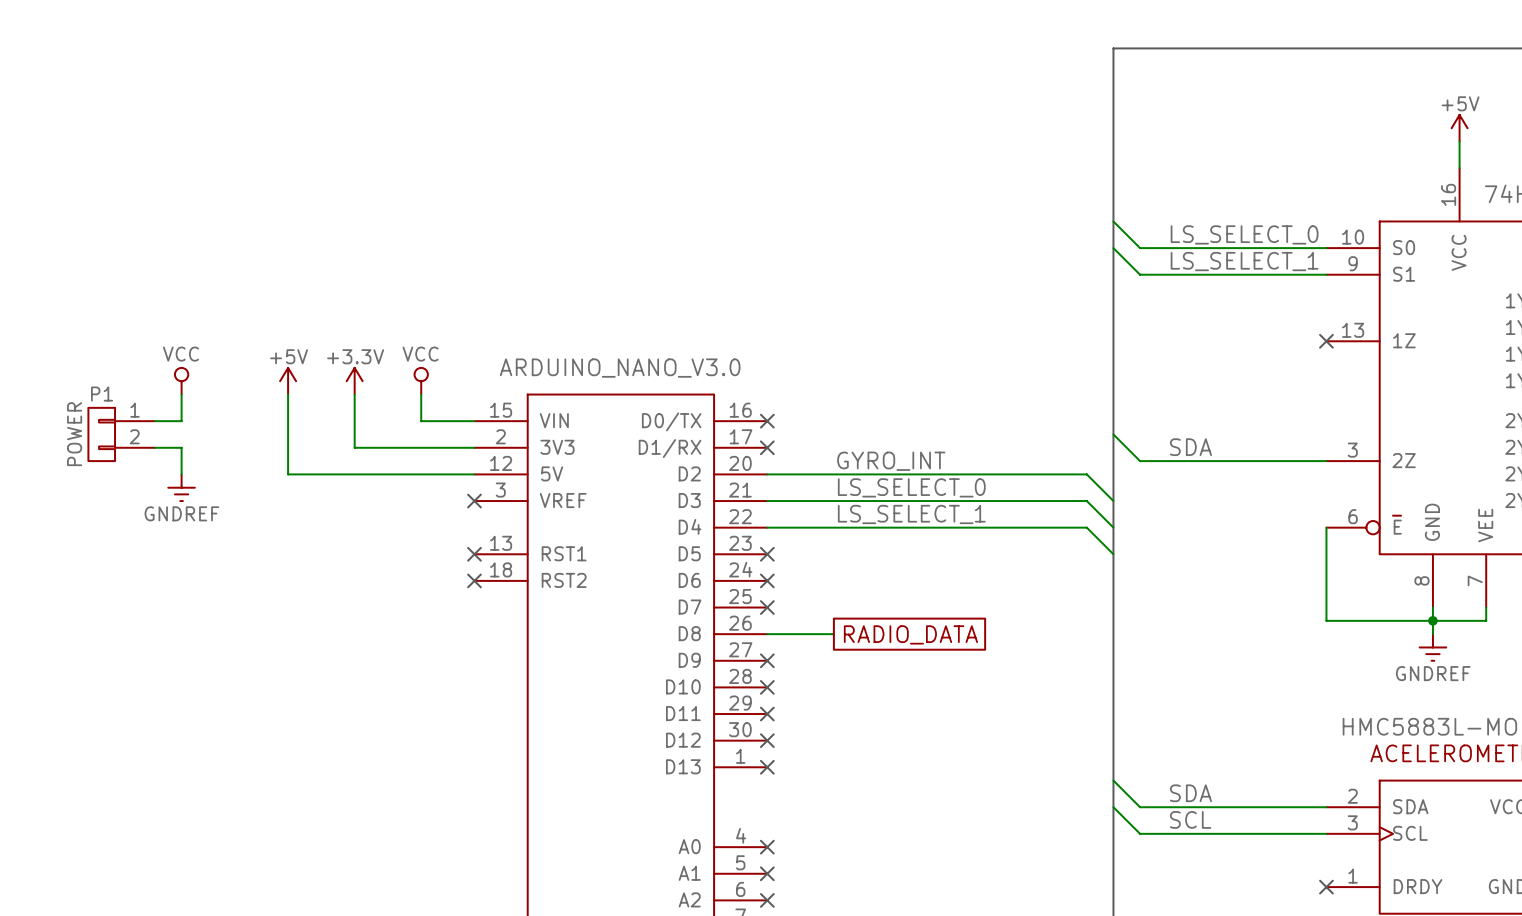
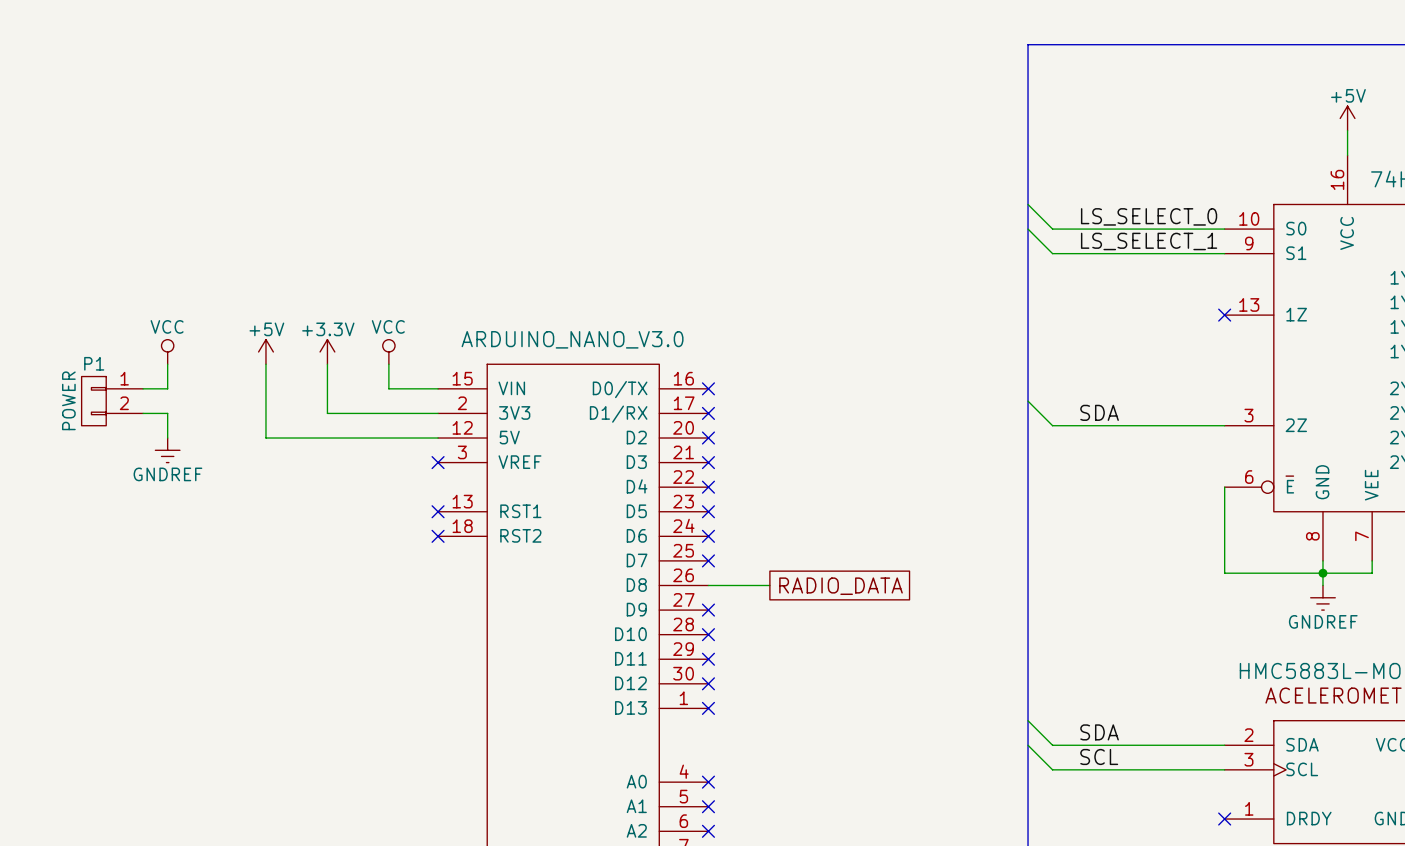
label: GYRO_INT (891, 461) -> none
wire: (767, 474) (1086, 474) (1113, 501) -> none
no-connect mark: none -> (708, 438)
label: LS_SELECT_0 (911, 487) -> none
wire: (767, 501) (1086, 501) (1113, 527) -> none
no-connect mark: none -> (708, 462)
label: LS_SELECT_1 (911, 514) -> none
wire: (767, 527) (1086, 527) (1113, 554) -> none
no-connect mark: none -> (708, 487)

